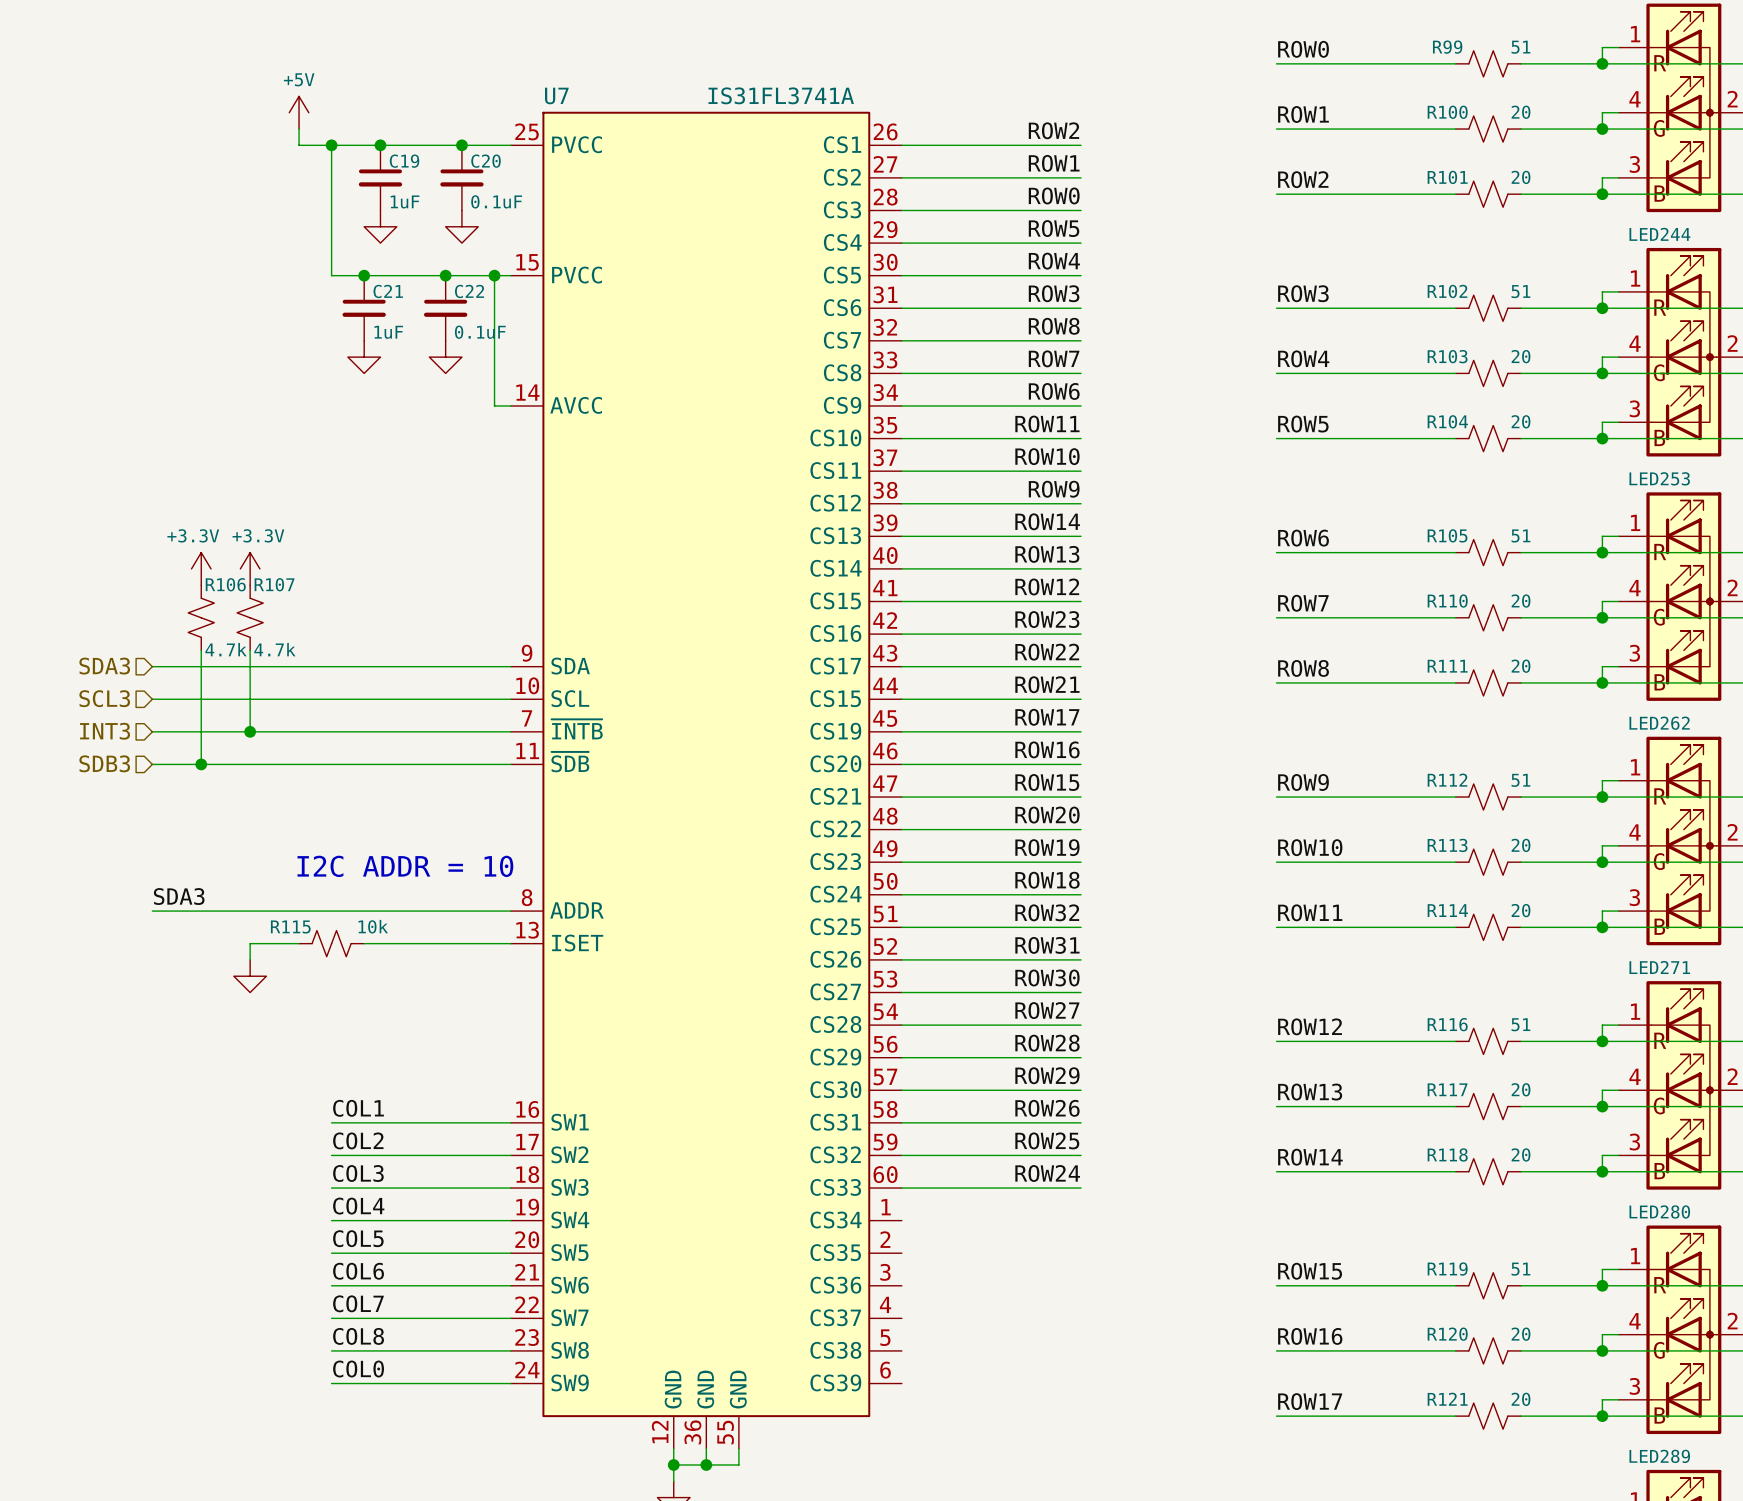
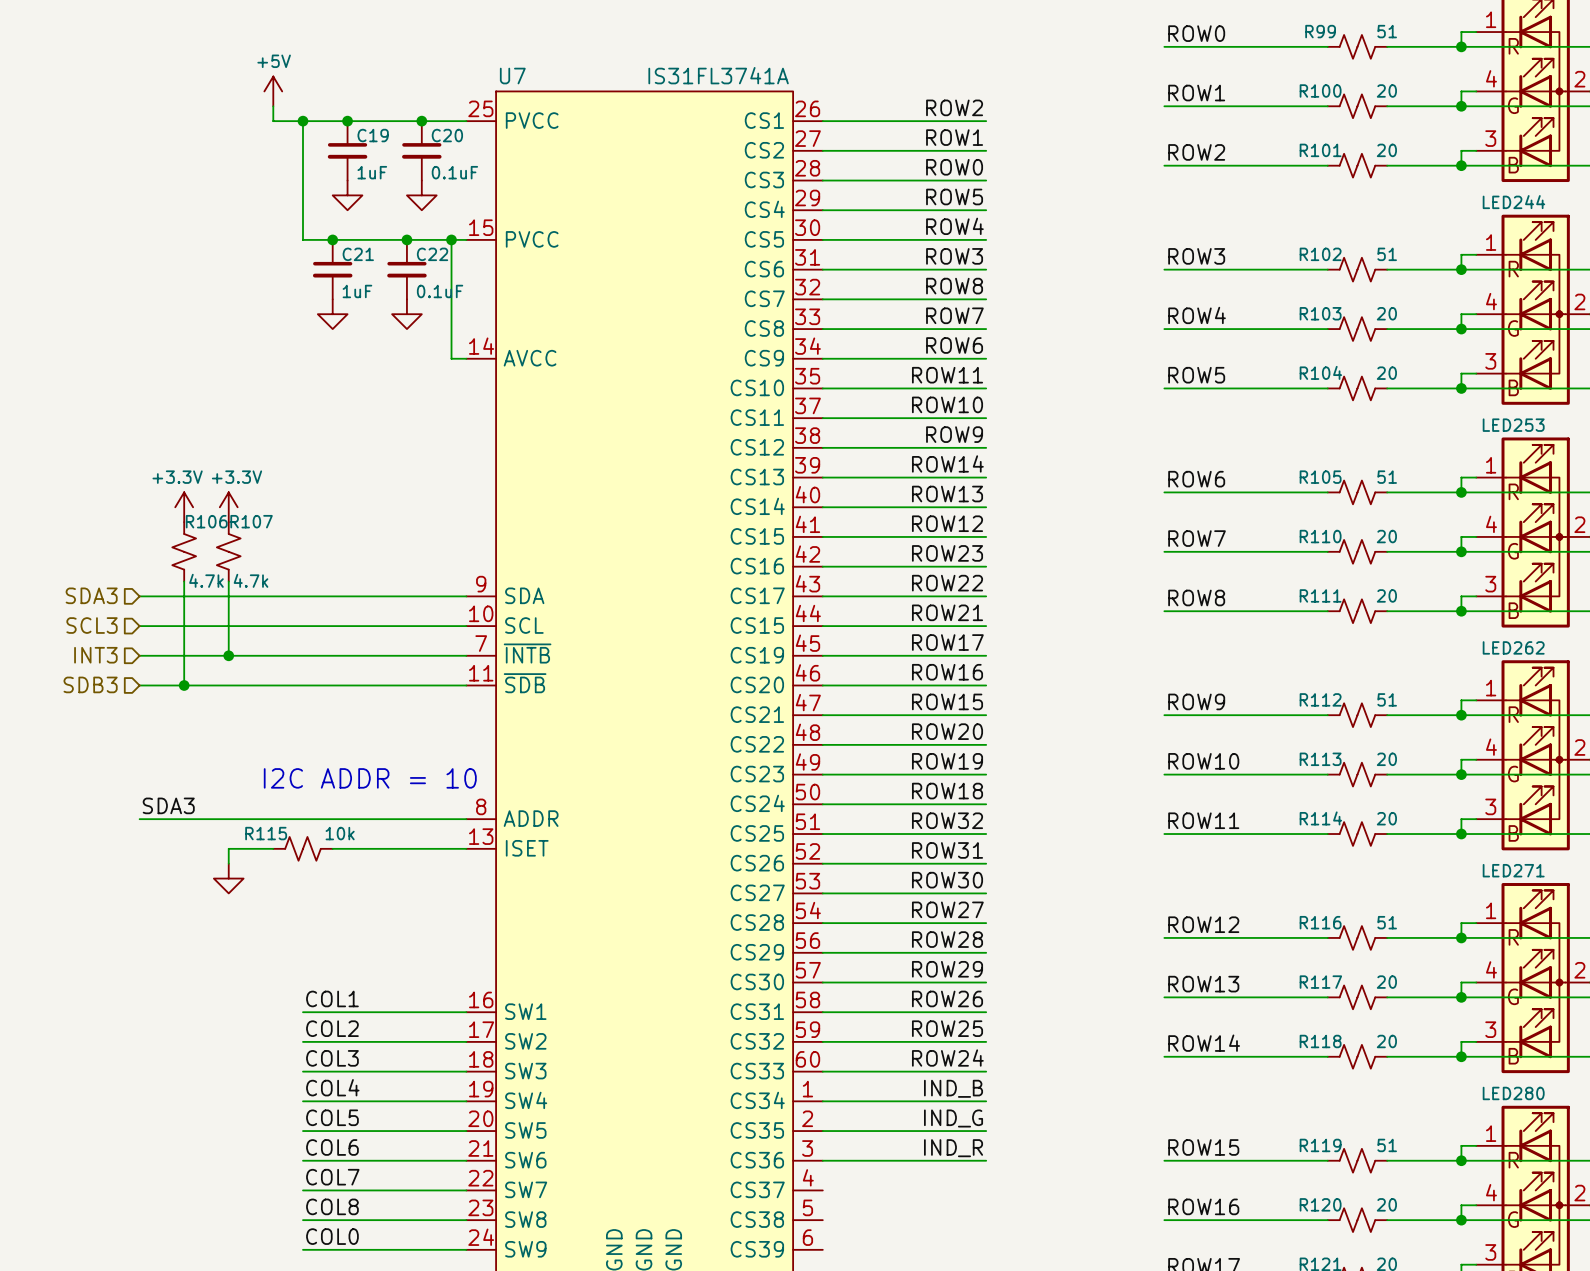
label: none -> IND_B (953, 1088)
wire: none -> (822, 1101) (986, 1101)
label: none -> IND_G (953, 1118)
wire: none -> (822, 1131) (986, 1131)
label: none -> IND_R (953, 1148)
wire: none -> (822, 1160) (986, 1160)

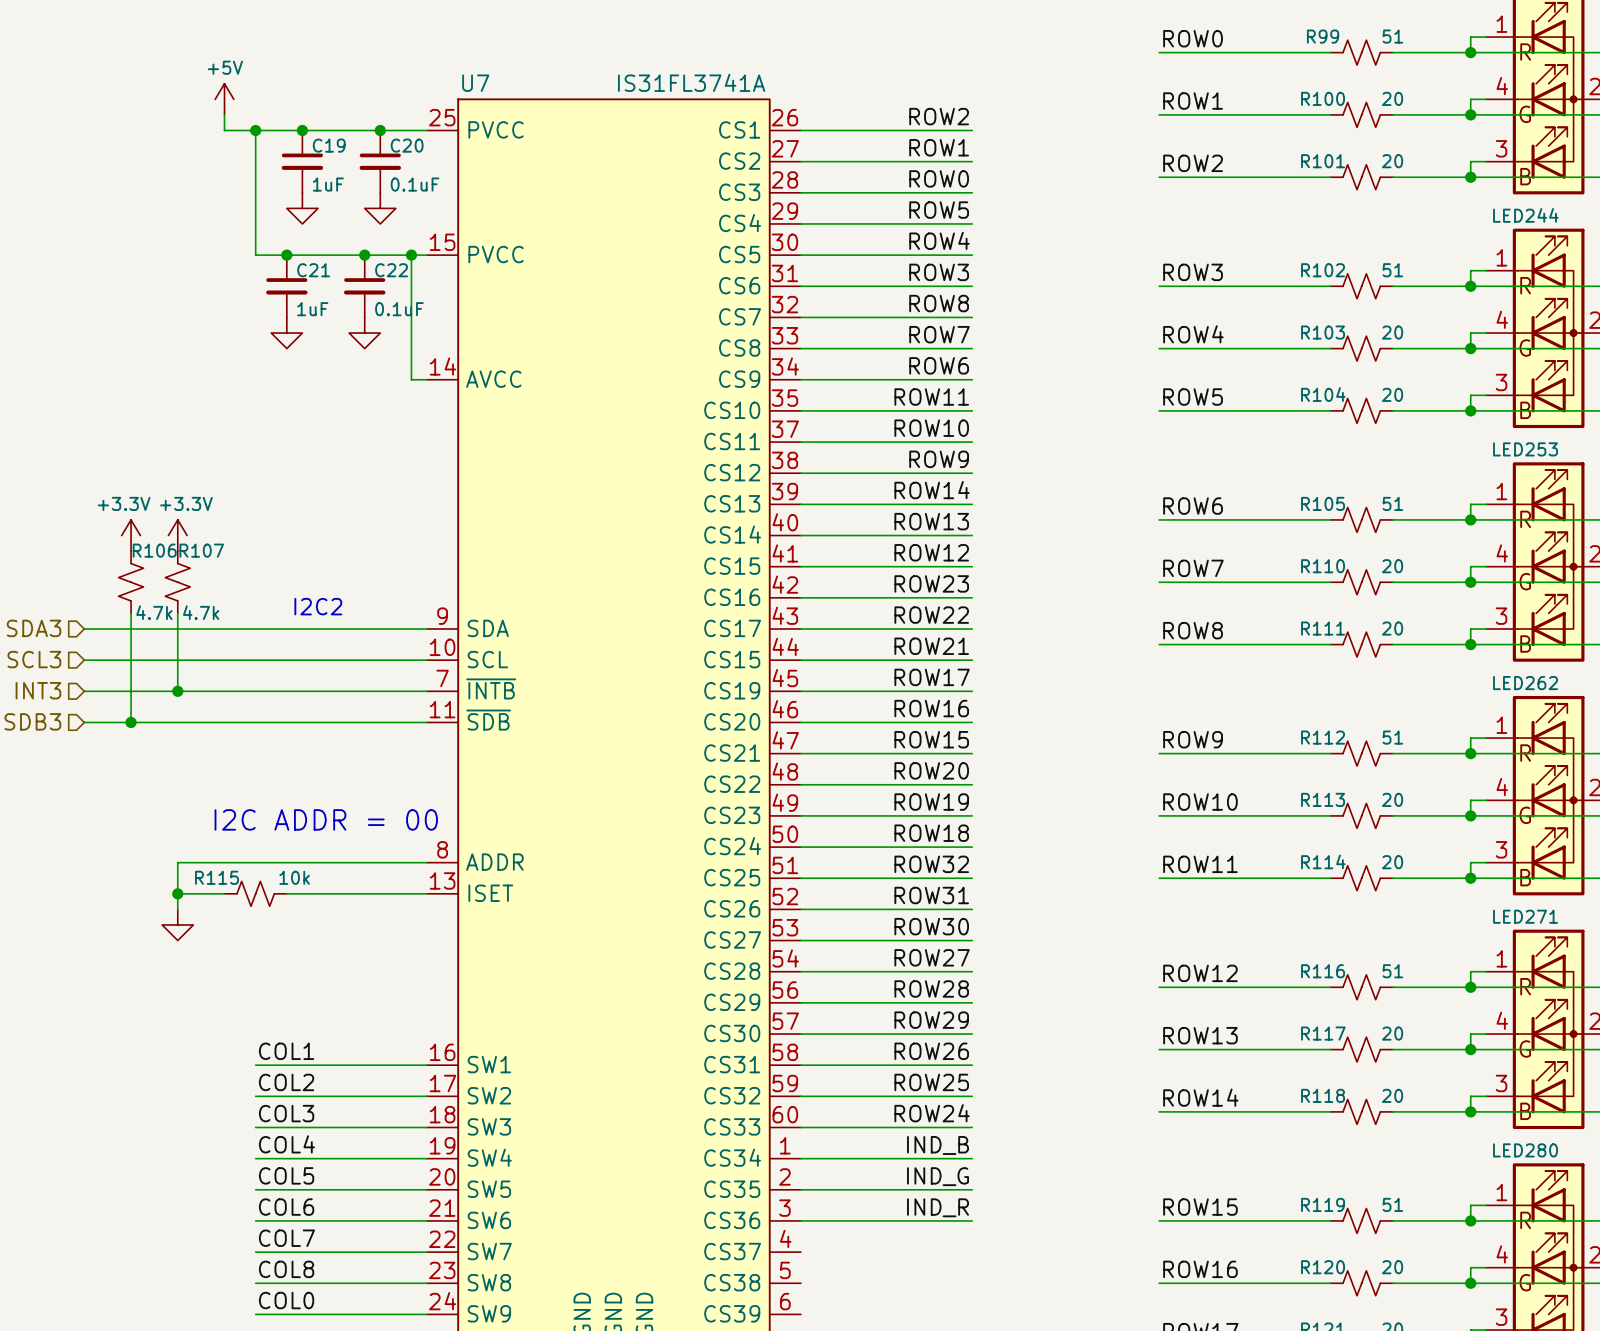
text: none -> I2C2 (318, 606)
text: I2C ADDR = 10 (370, 778) -> I2C ADDR = 00 (326, 819)
label: SDA3 (168, 805) -> none
wire: (139, 819) (228, 819) -> (177, 893) (177, 862)
junction: none -> (177, 893)

